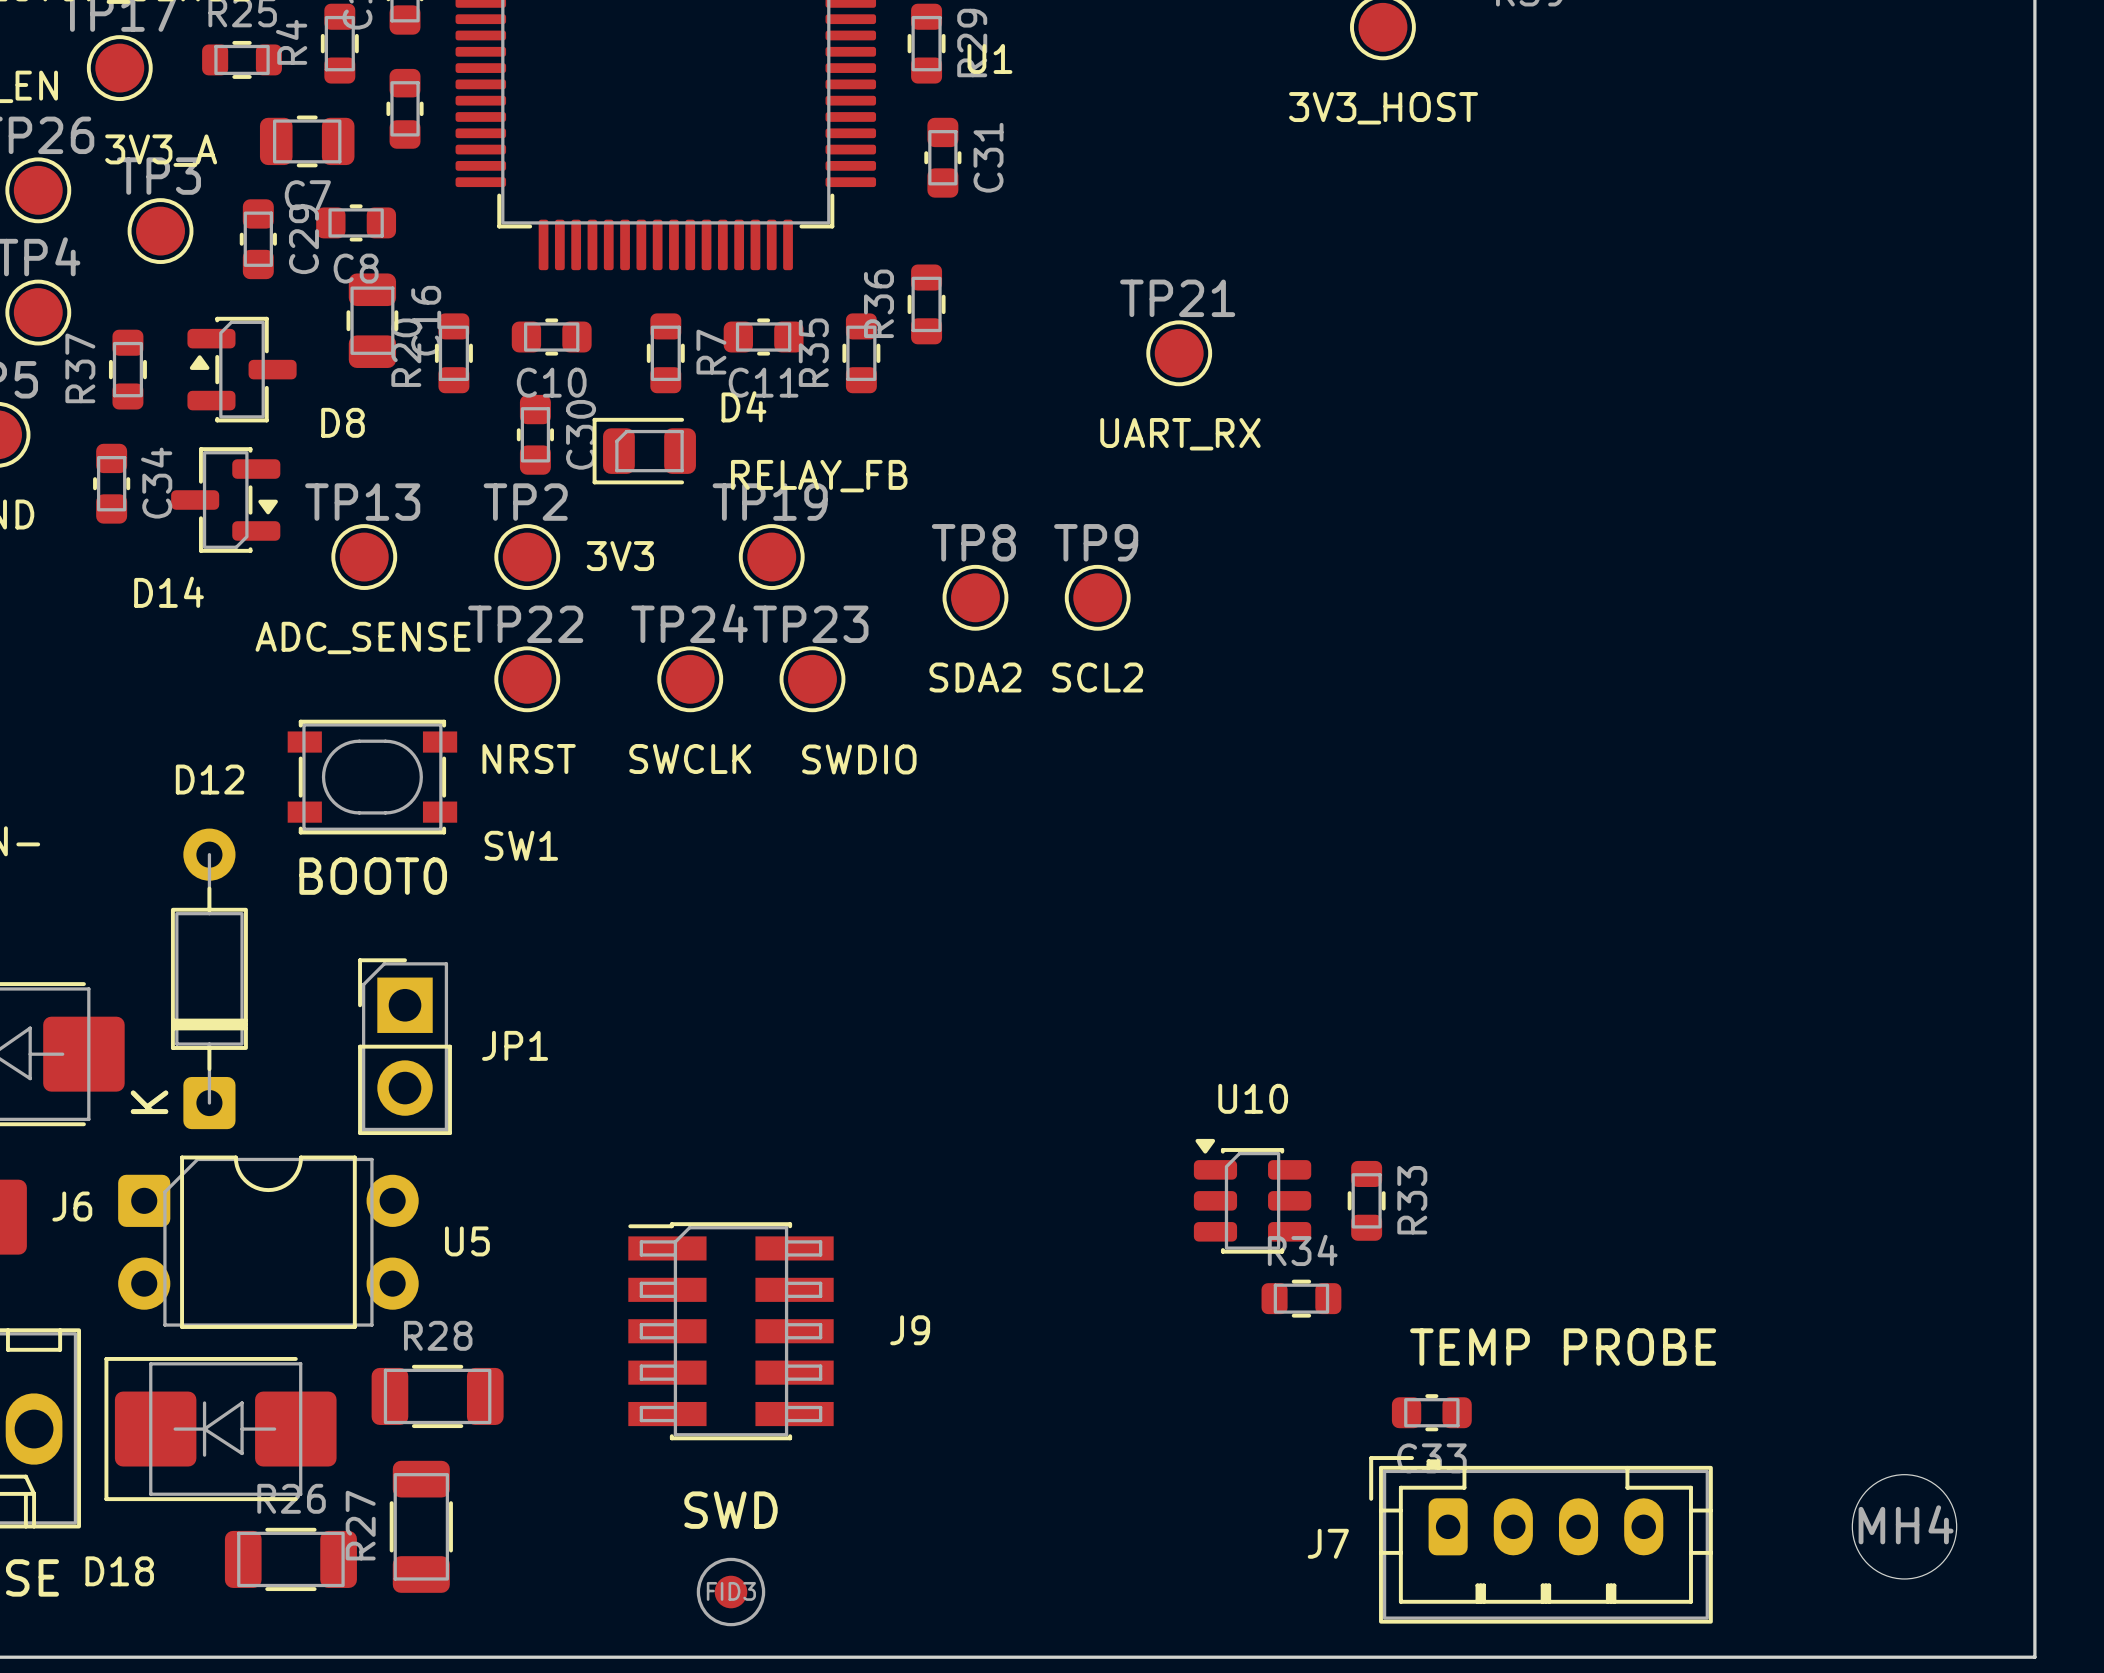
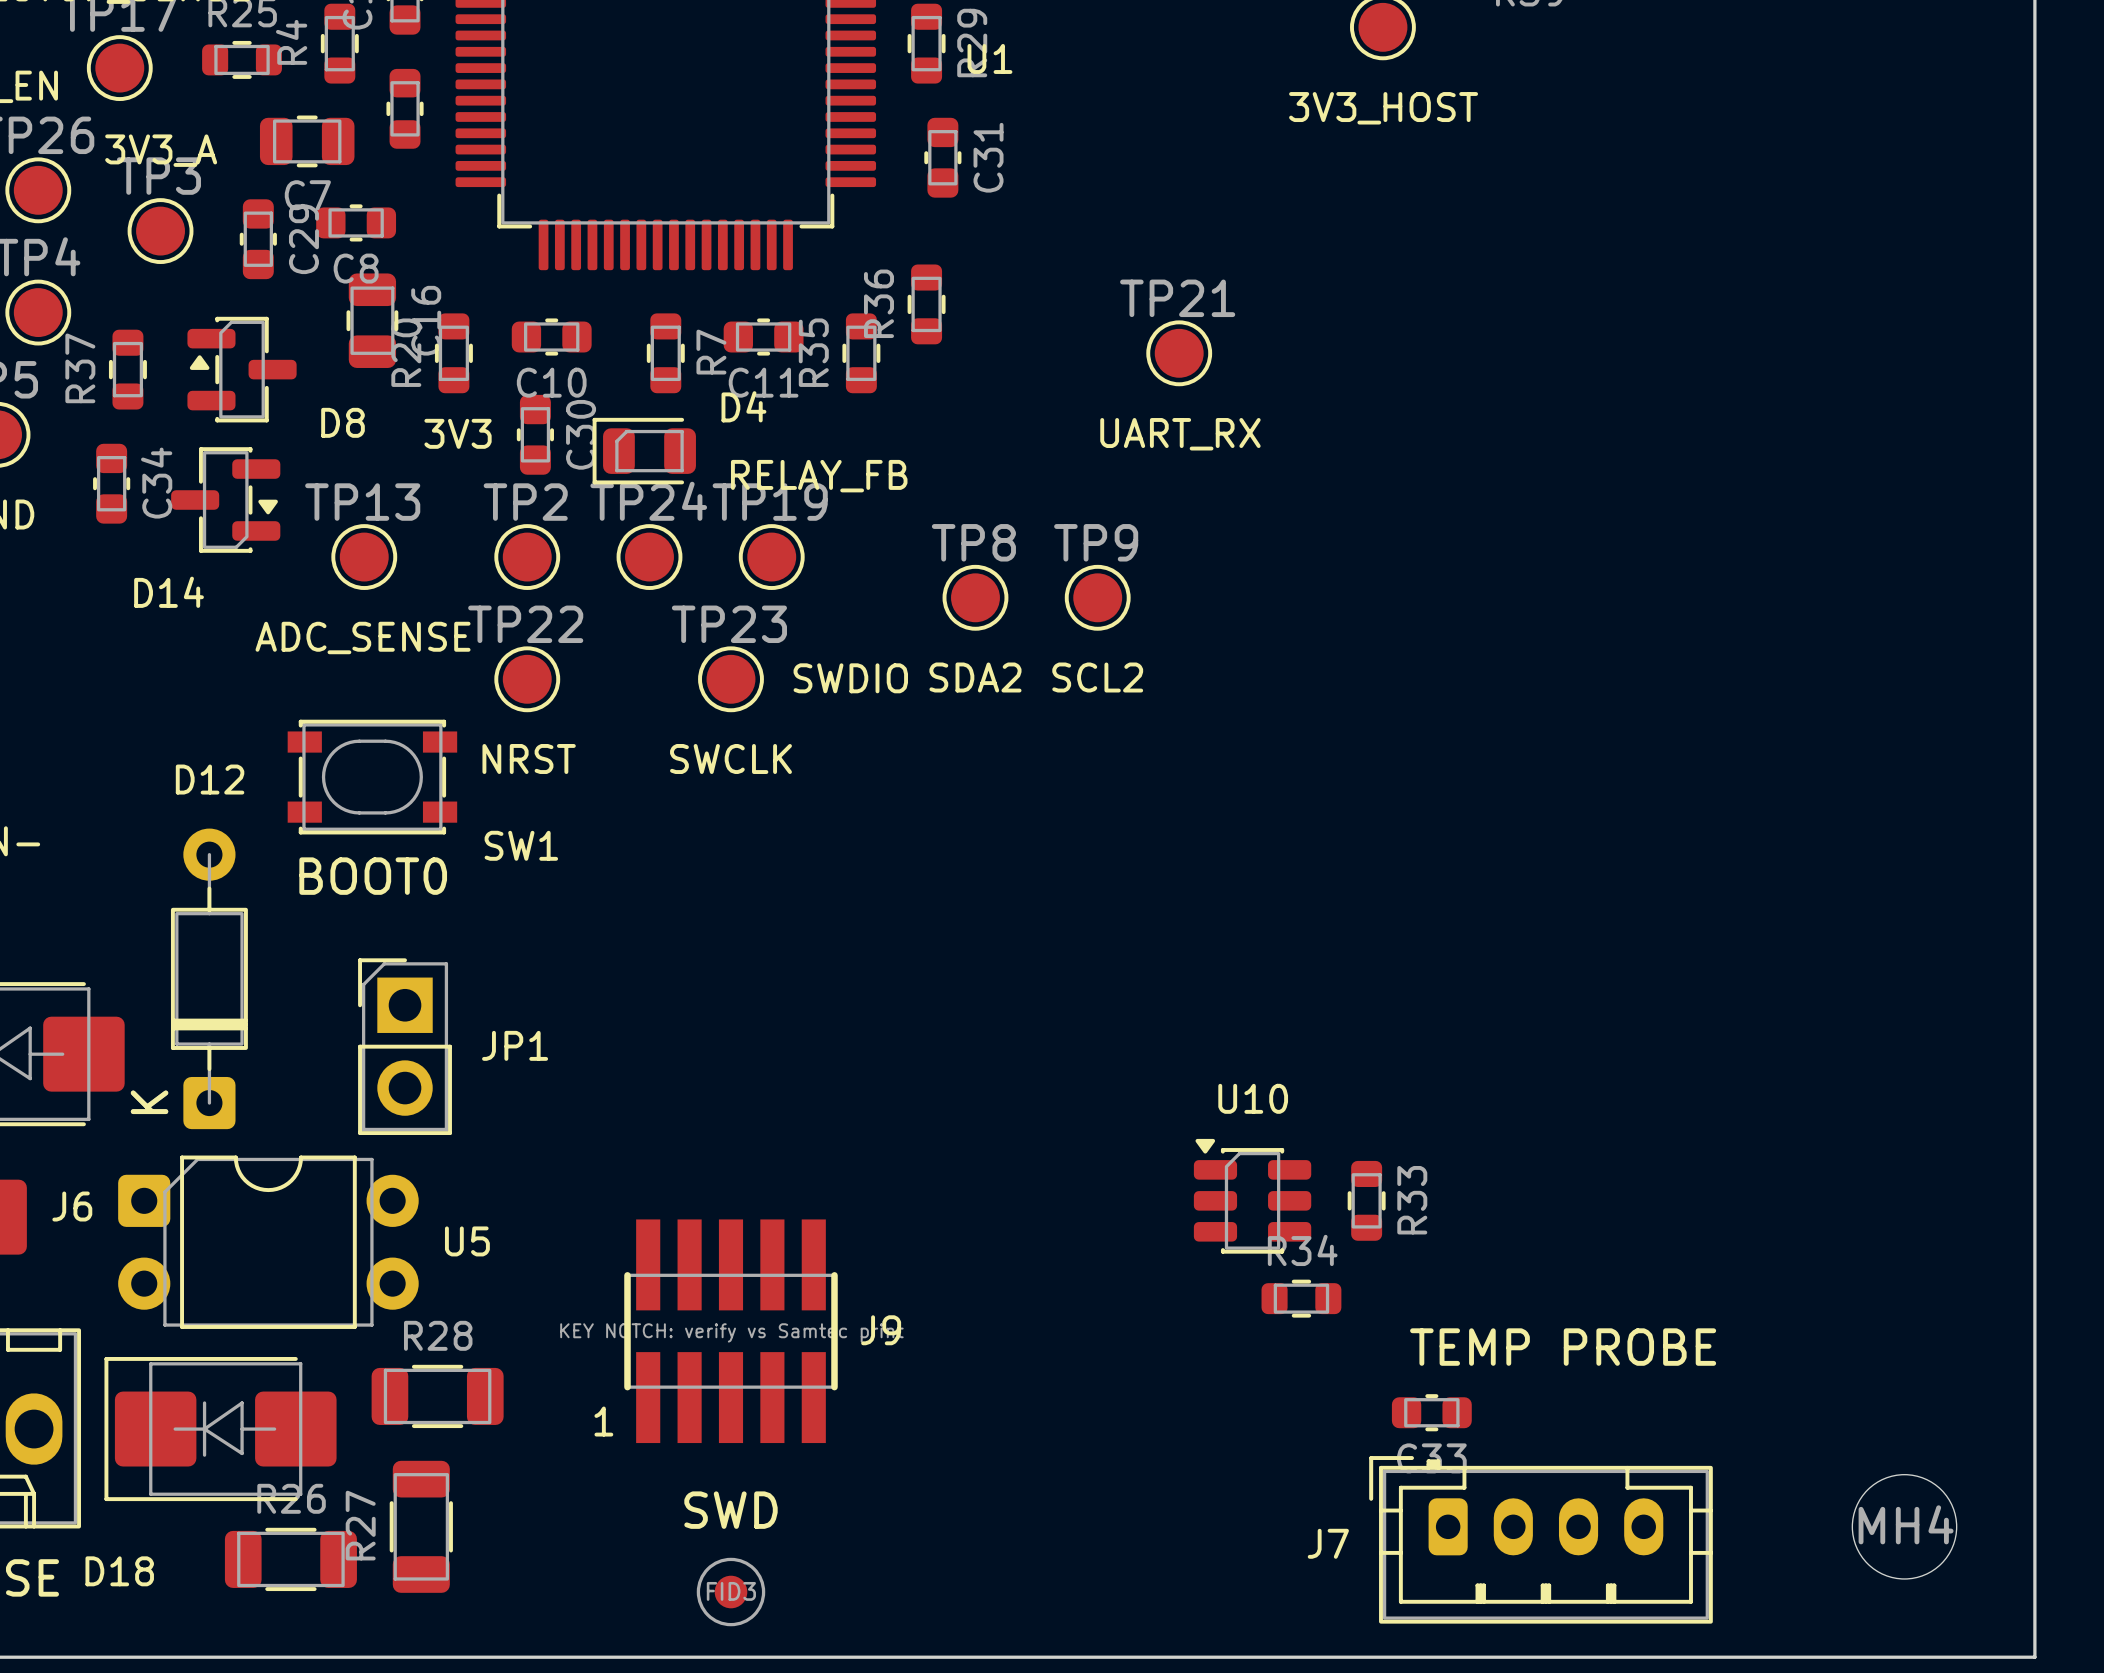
text position: 3V3 (620, 556) -> 3V3 (458, 433)
TP24 position: (690, 679) -> (649, 557)
TP23 position: (812, 679) -> (730, 679)
text position: SWCLK (690, 758) -> SWCLK (730, 758)
text position: SWDIO (859, 759) -> SWDIO (850, 678)
J9 footprint: [628, 1222, 834, 1441] -> [624, 1219, 838, 1444]

